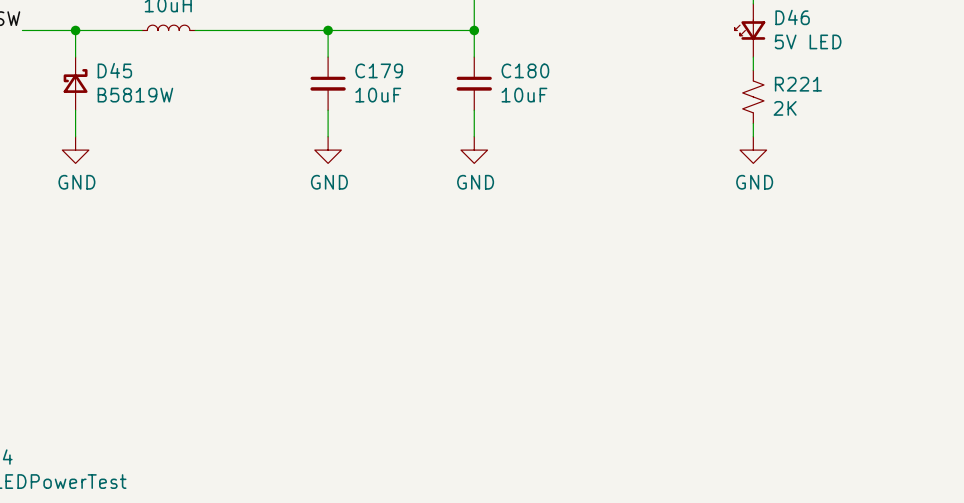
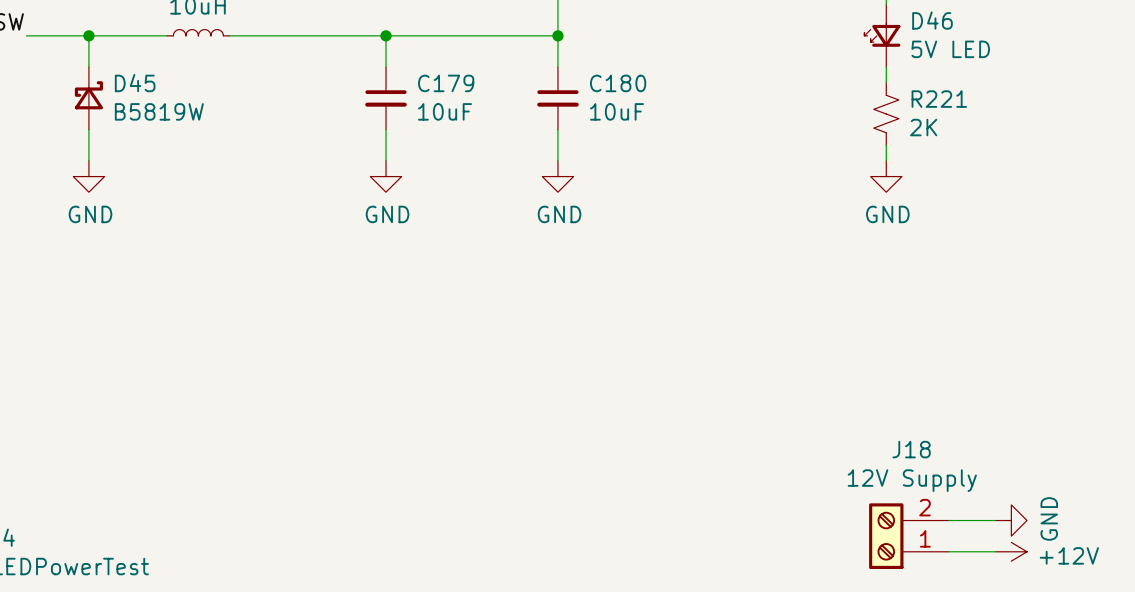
wire: none -> (948, 520) (995, 520)
power symbol: none -> GND (1011, 520)
J18: none -> 12V Supply (908, 536)
wire: none -> (948, 551) (995, 551)
power symbol: none -> +12V (1011, 551)

